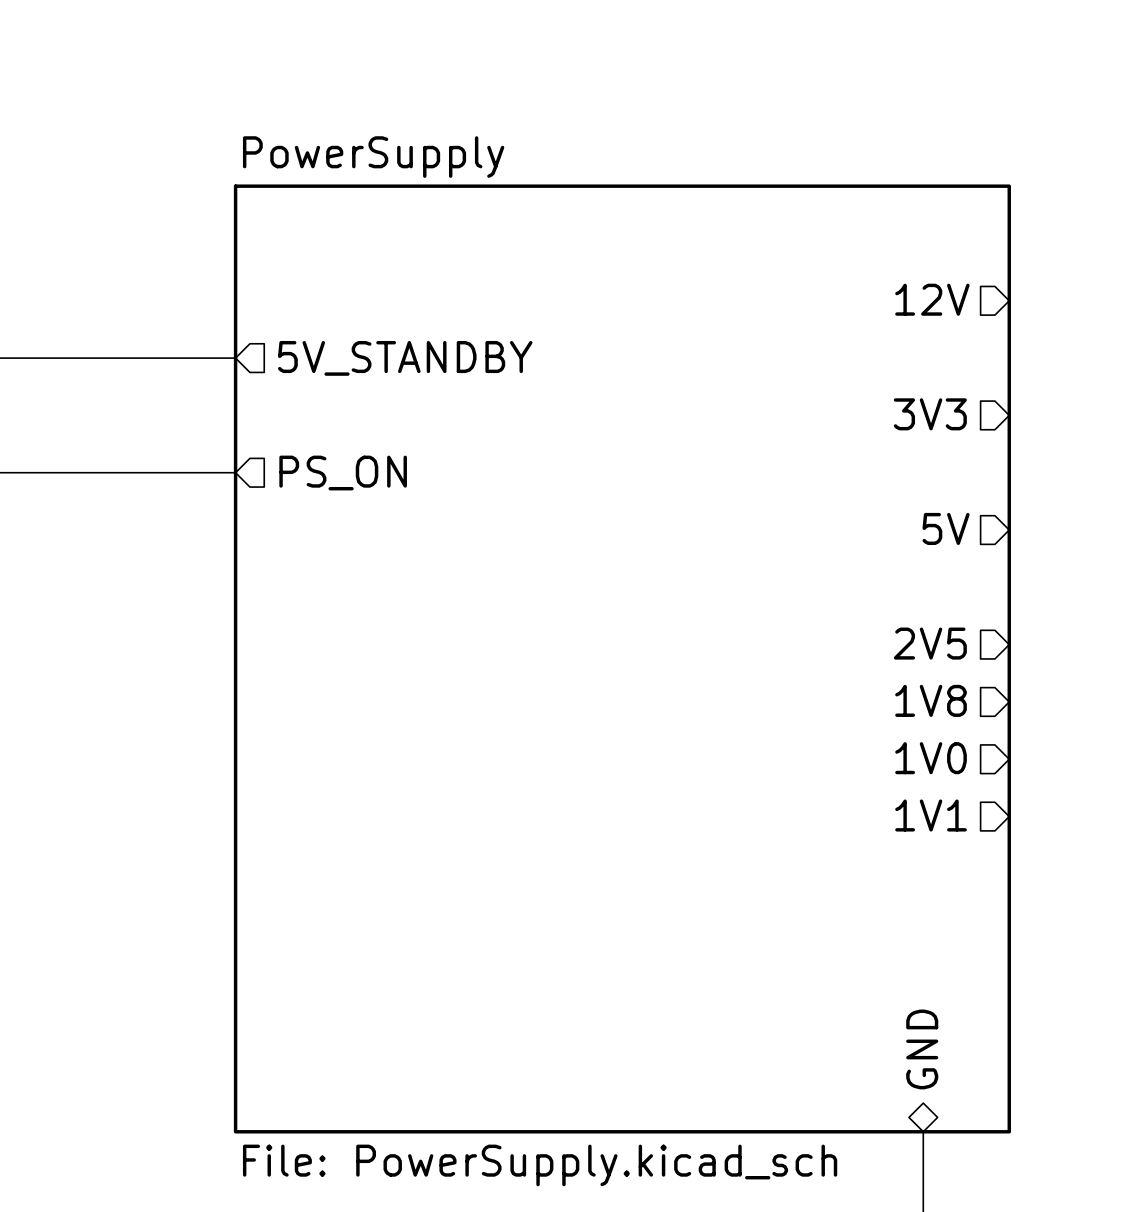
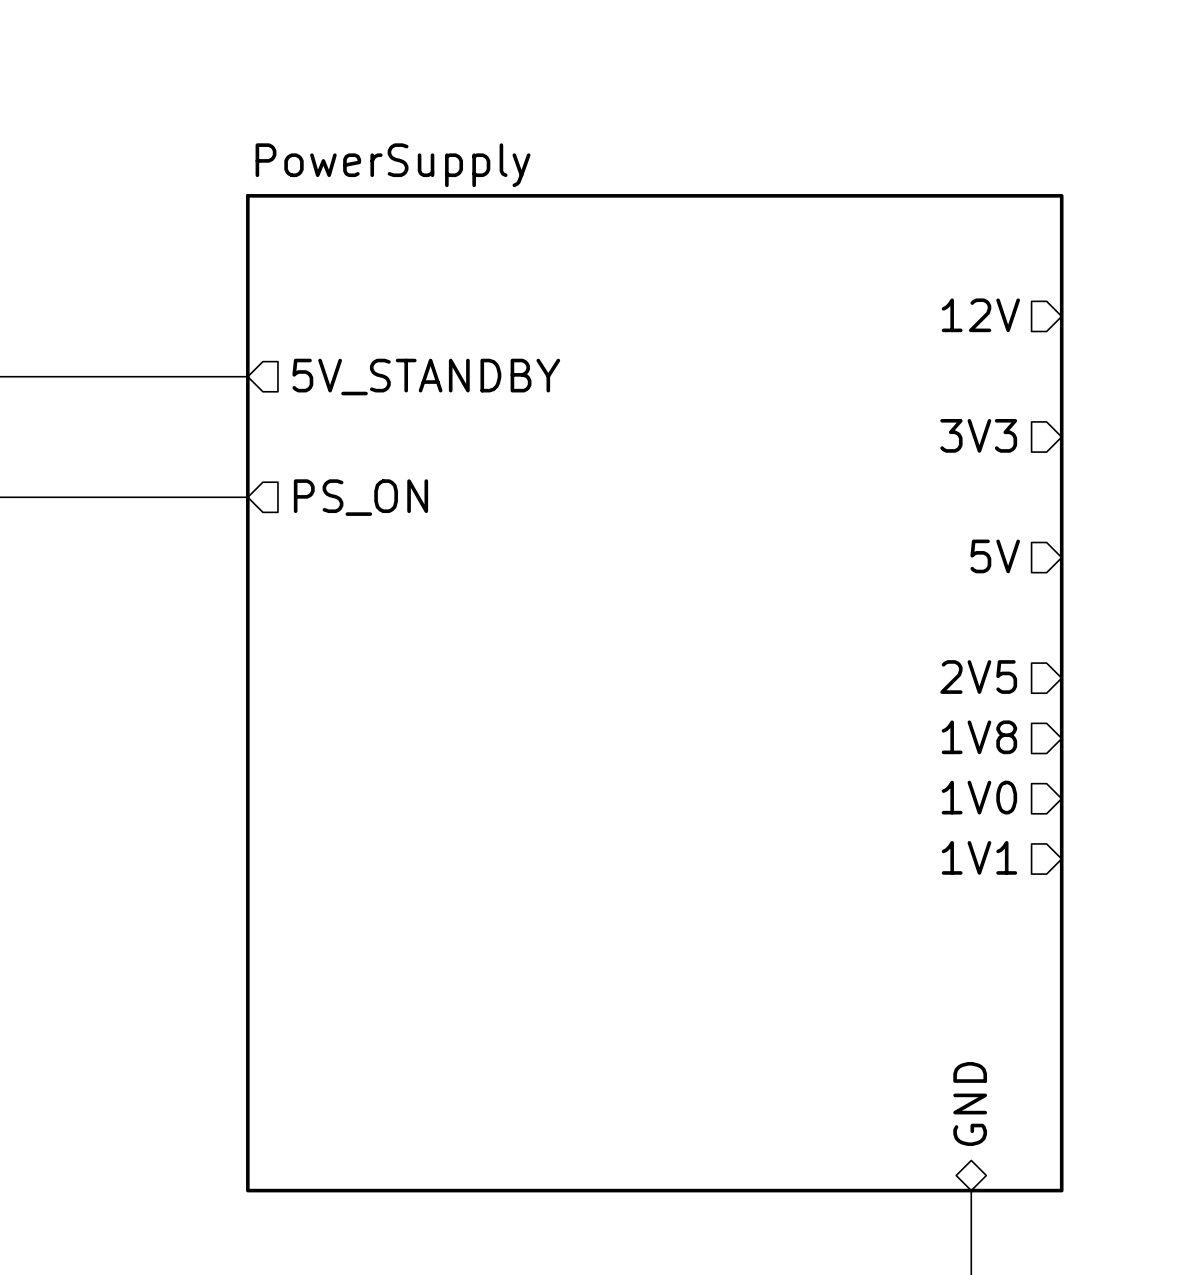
sheet PowerSupply value: File: PowerSupply.kicad_sch (540, 1165) -> none

